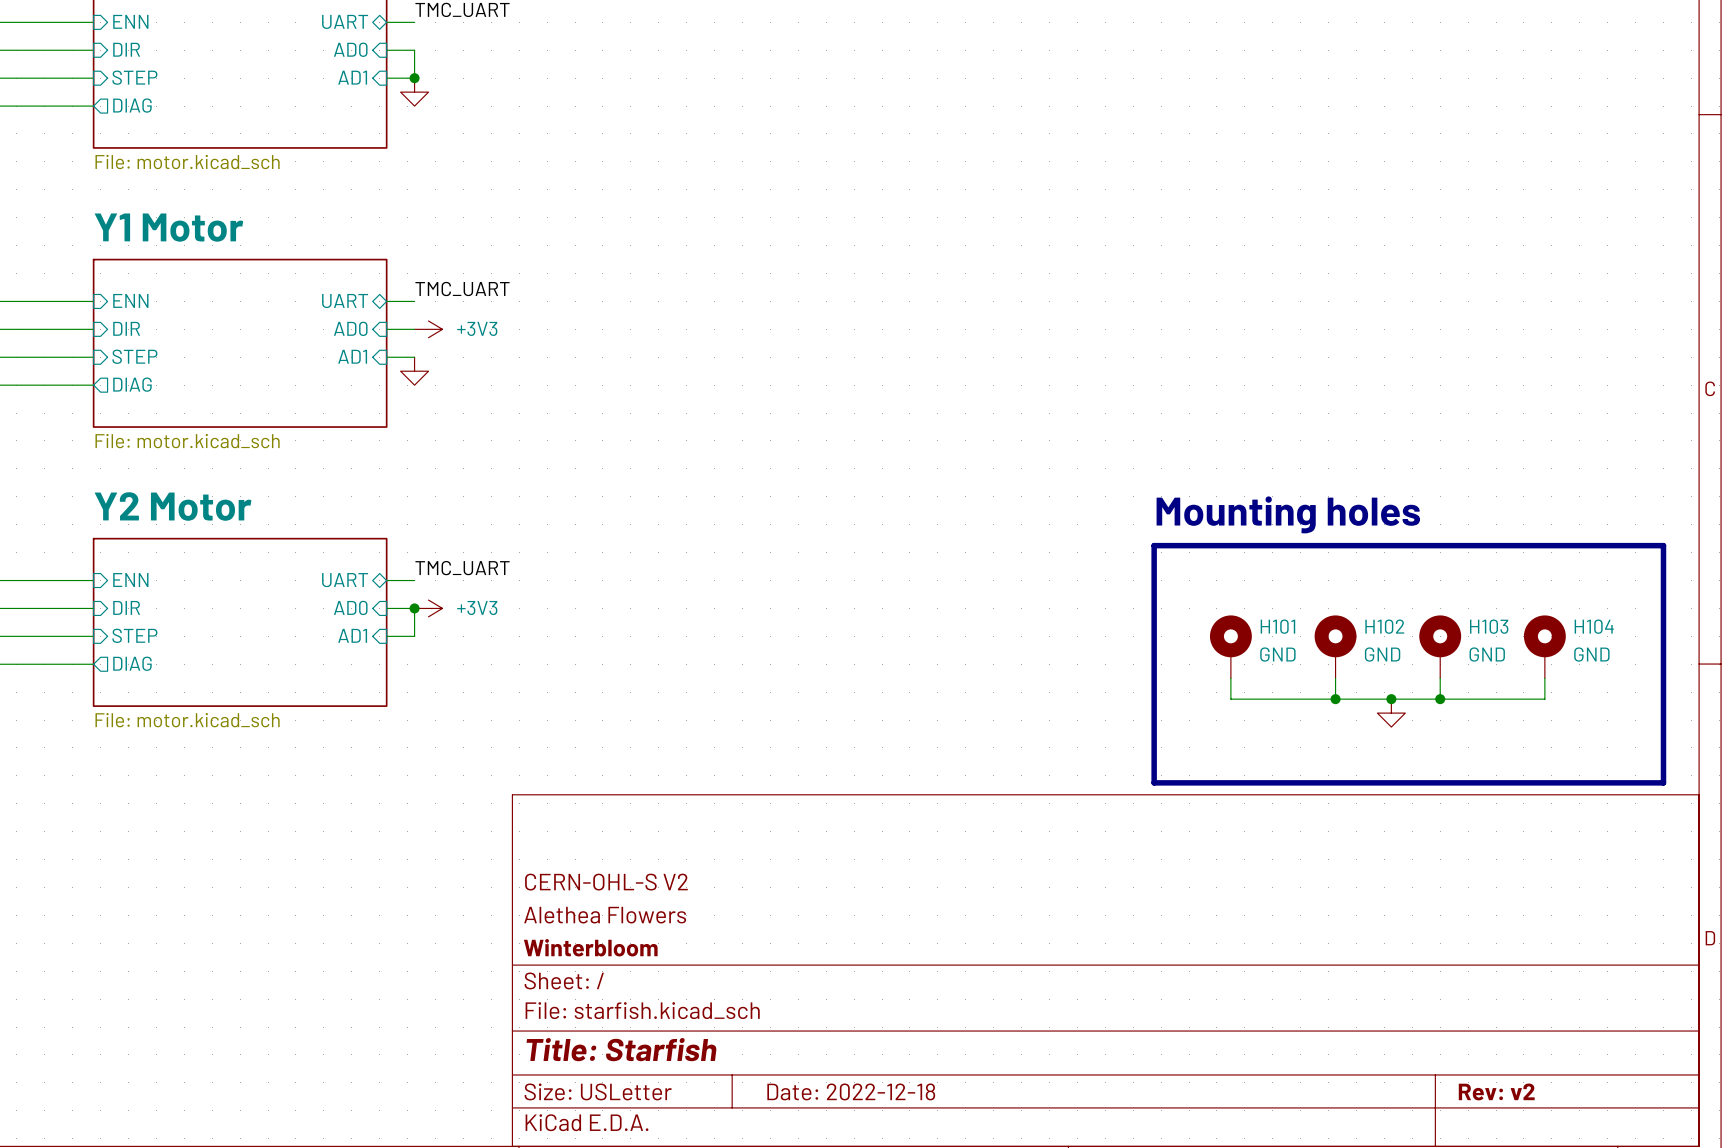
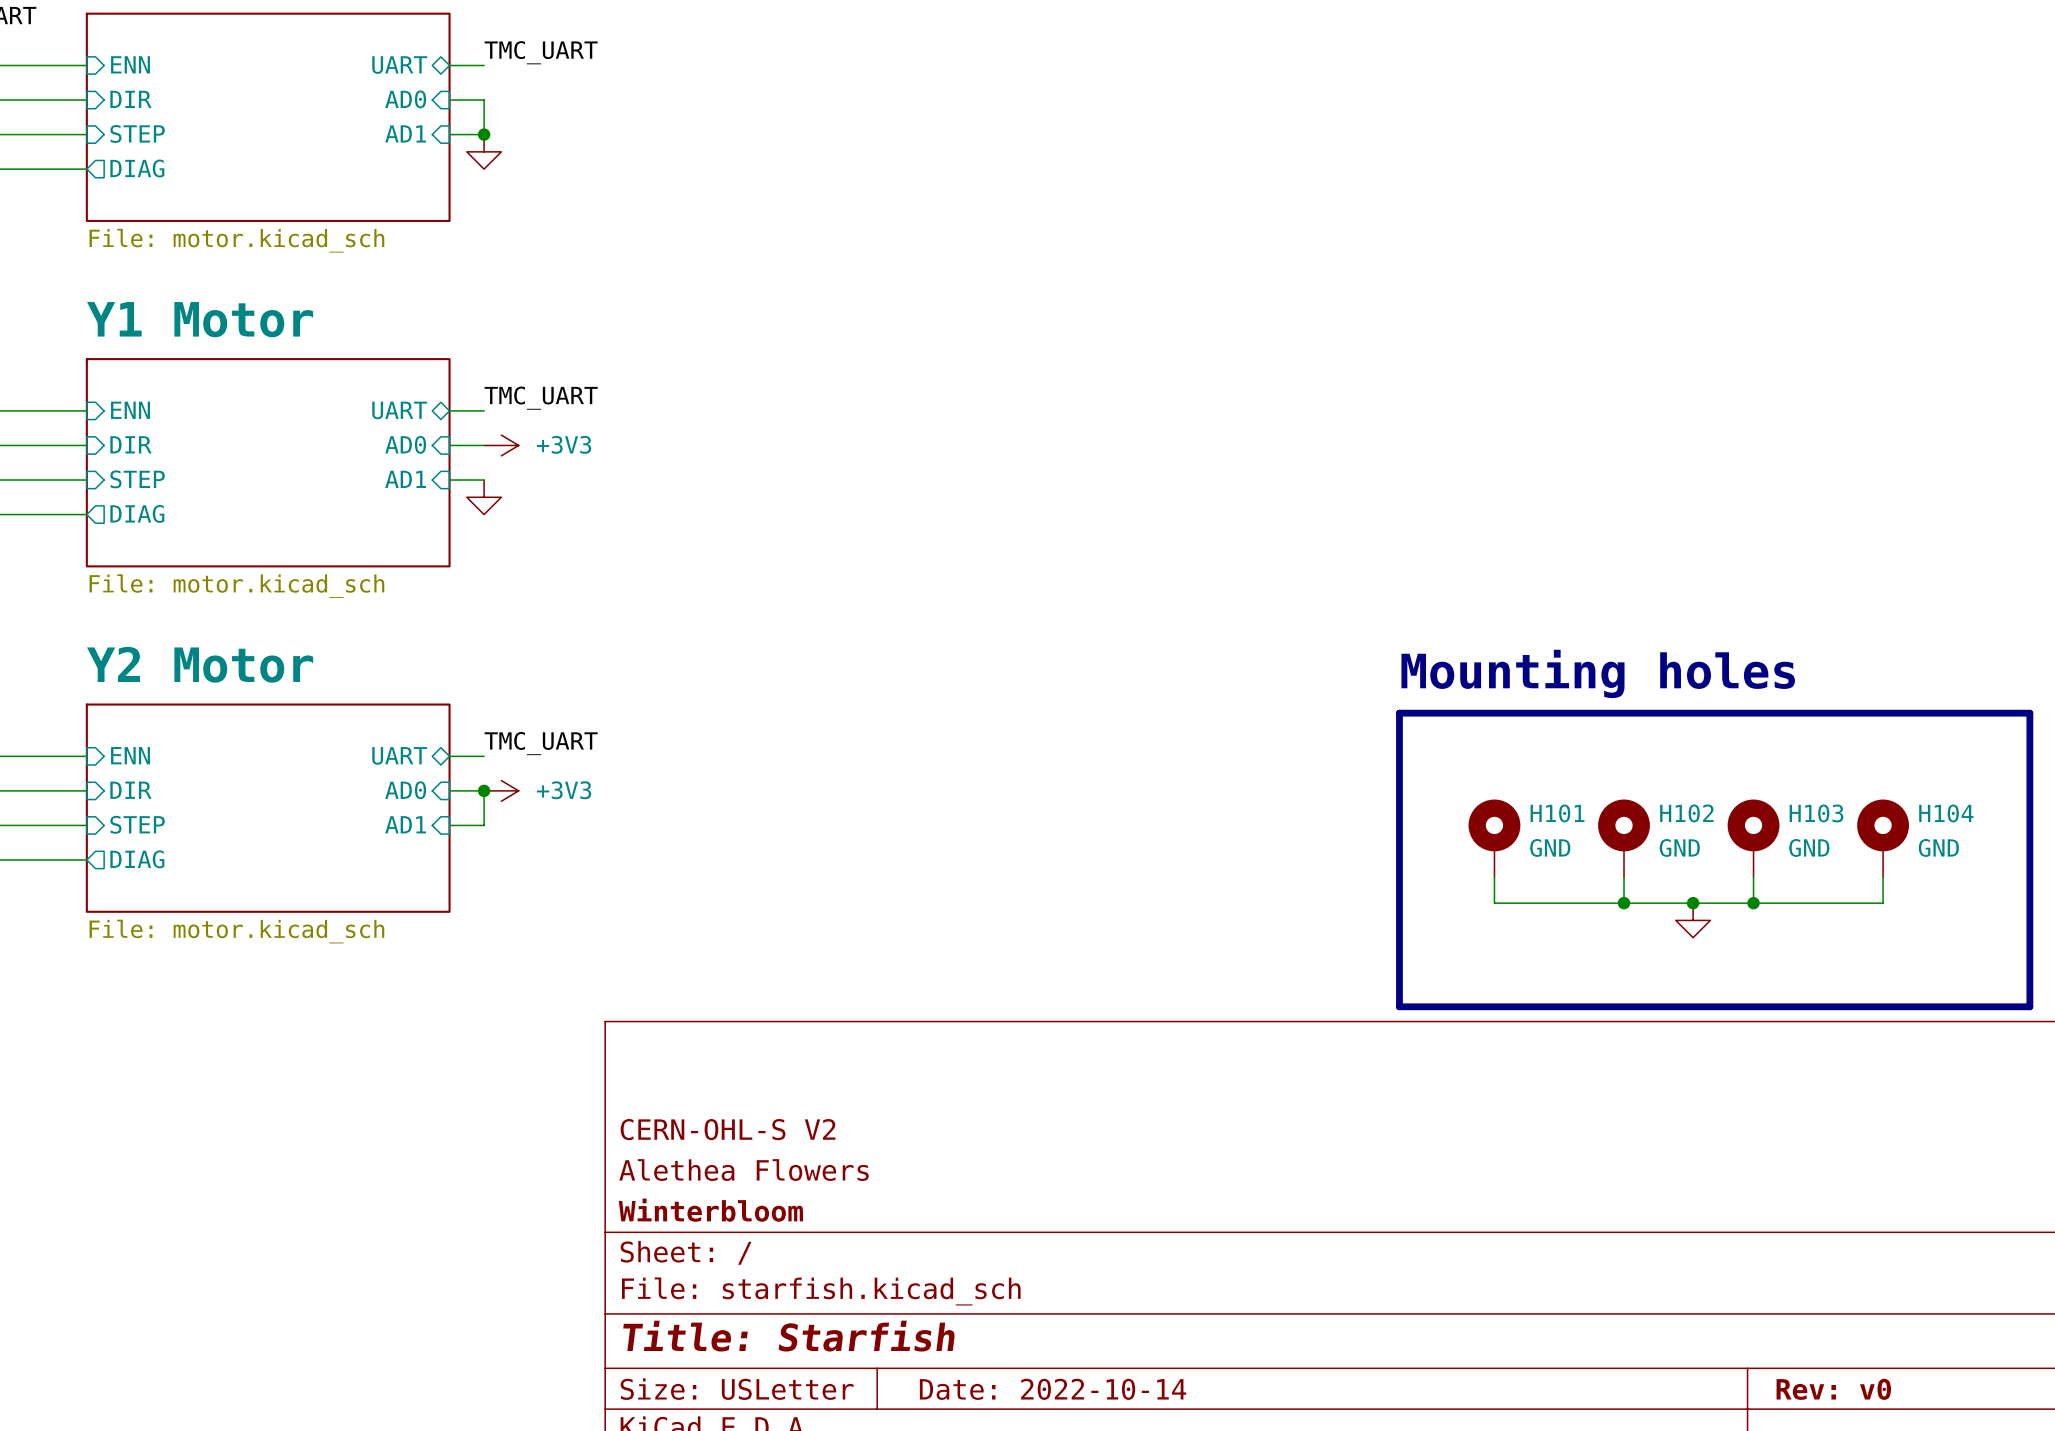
title block: Date: 2022-12-18 (851, 1091) -> Date: 2022-10-14 (1053, 1389)
title block: Rev: v2 (1496, 1091) -> Rev: v0 (1833, 1389)

